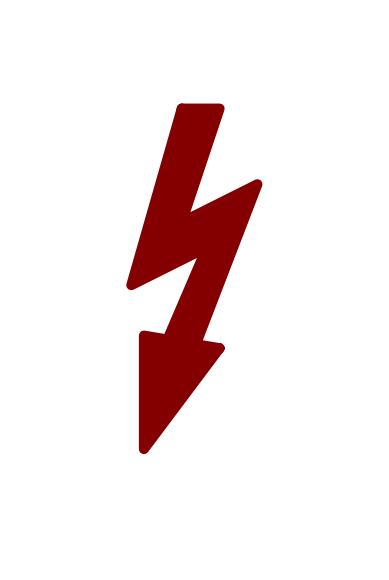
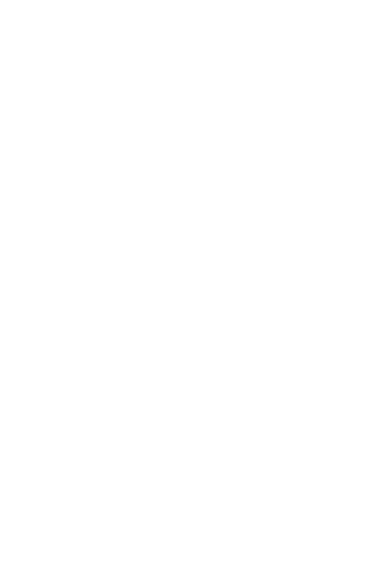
part: (194, 278) -> none

